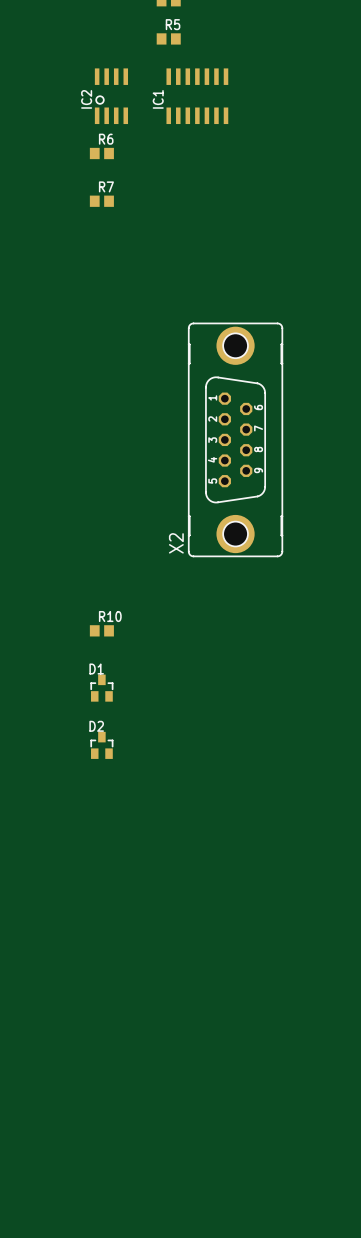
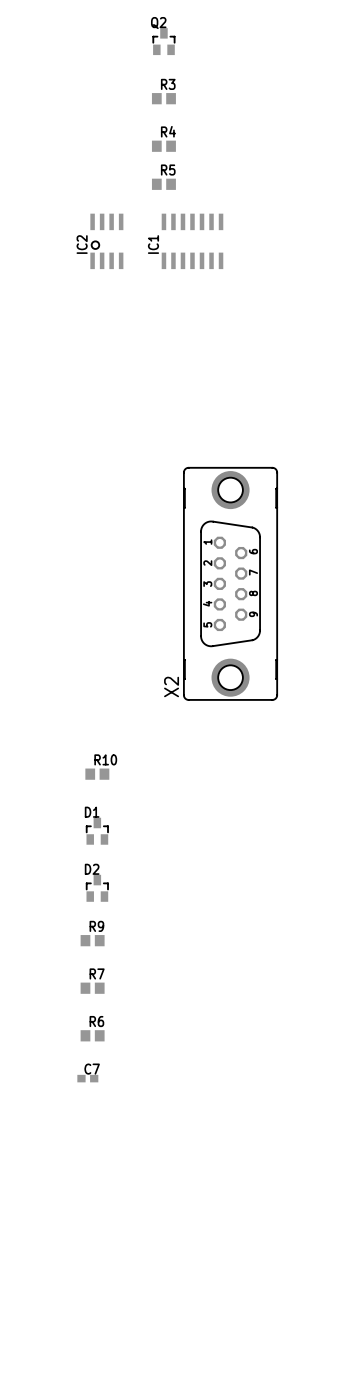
R6 position: (101, 153) -> (92, 1035)
R7 position: (101, 201) -> (92, 988)
R9: none -> (92, 940)
C7: none -> (87, 1078)

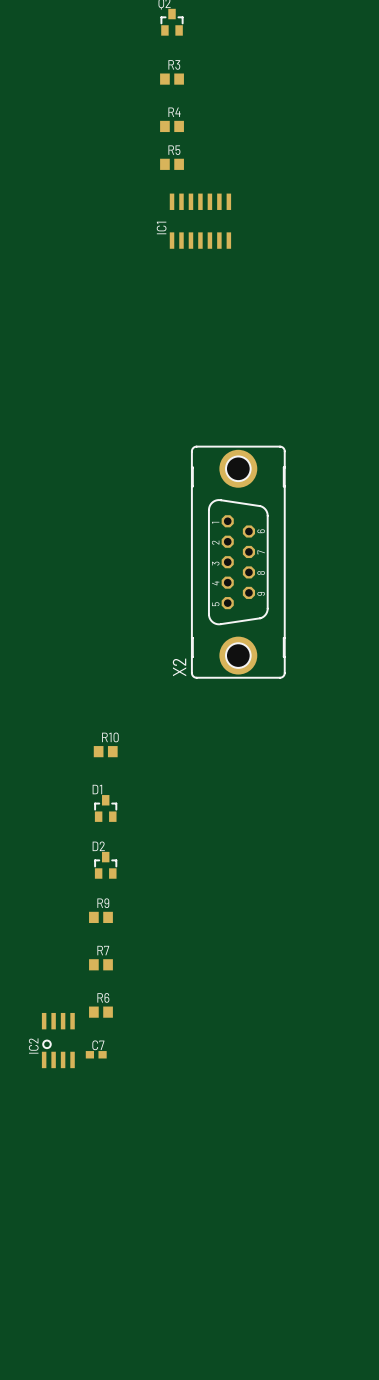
IC2 position: (106, 241) -> (58, 1040)

